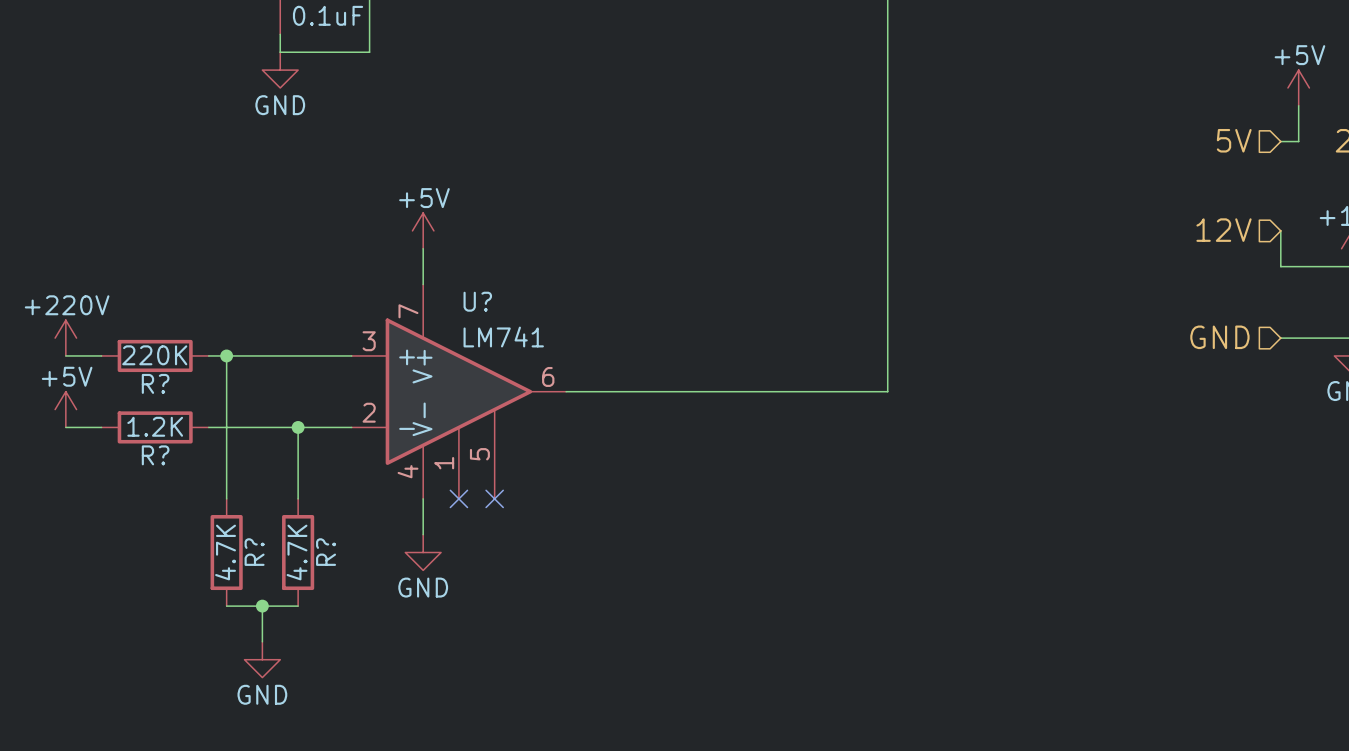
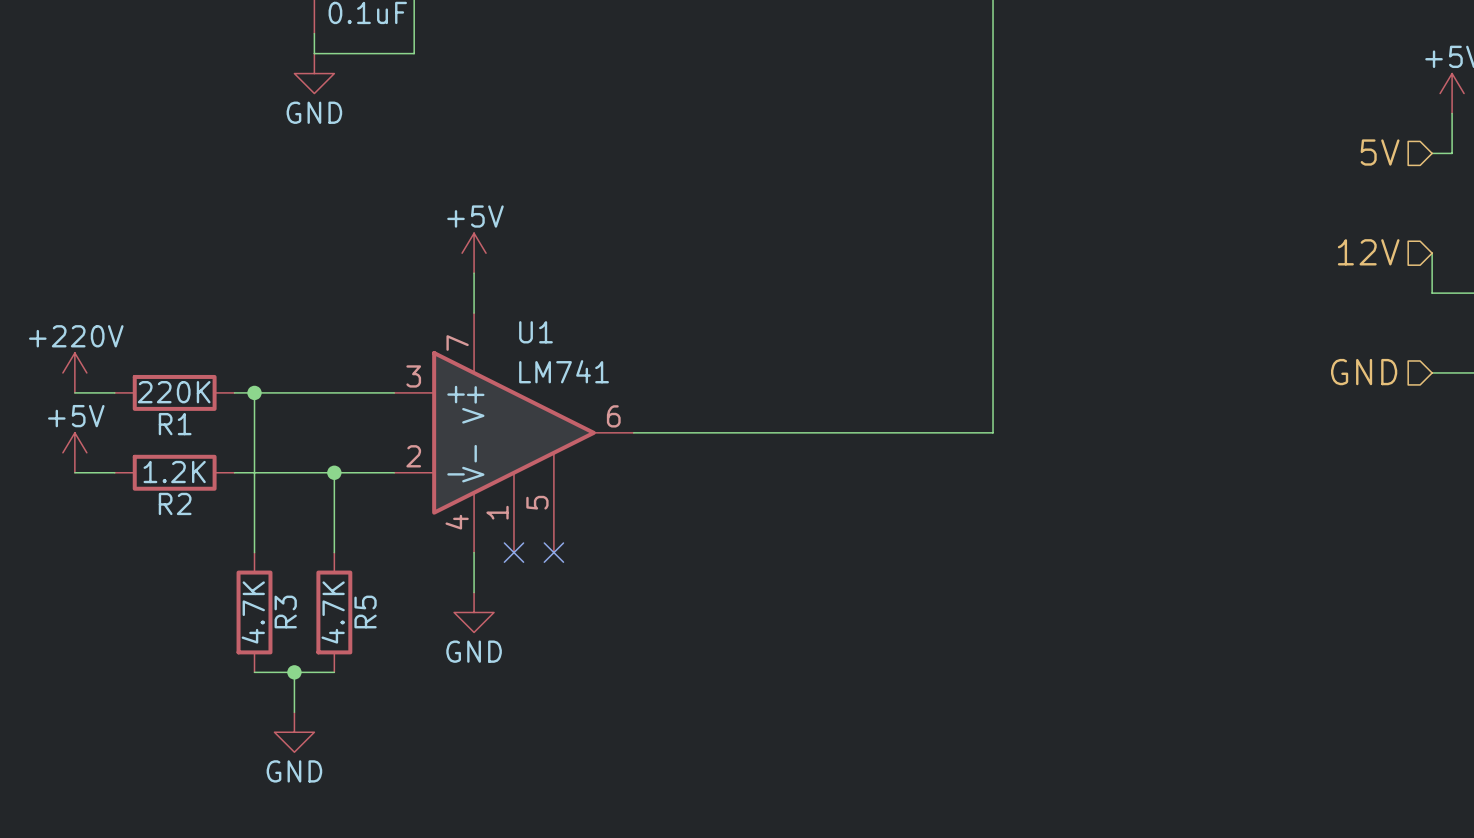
U? name: U? (477, 301) -> U1 (535, 332)
R? name: R? (155, 383) -> R1 (175, 424)
R? name: R? (155, 455) -> R2 (175, 503)
R? name: R? (254, 552) -> R3 (285, 612)
R? name: R? (326, 552) -> R5 (365, 612)

